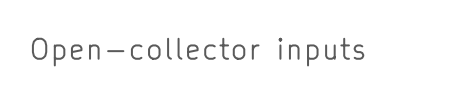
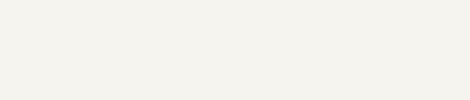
text: Open-collector inputs (198, 52) -> none

